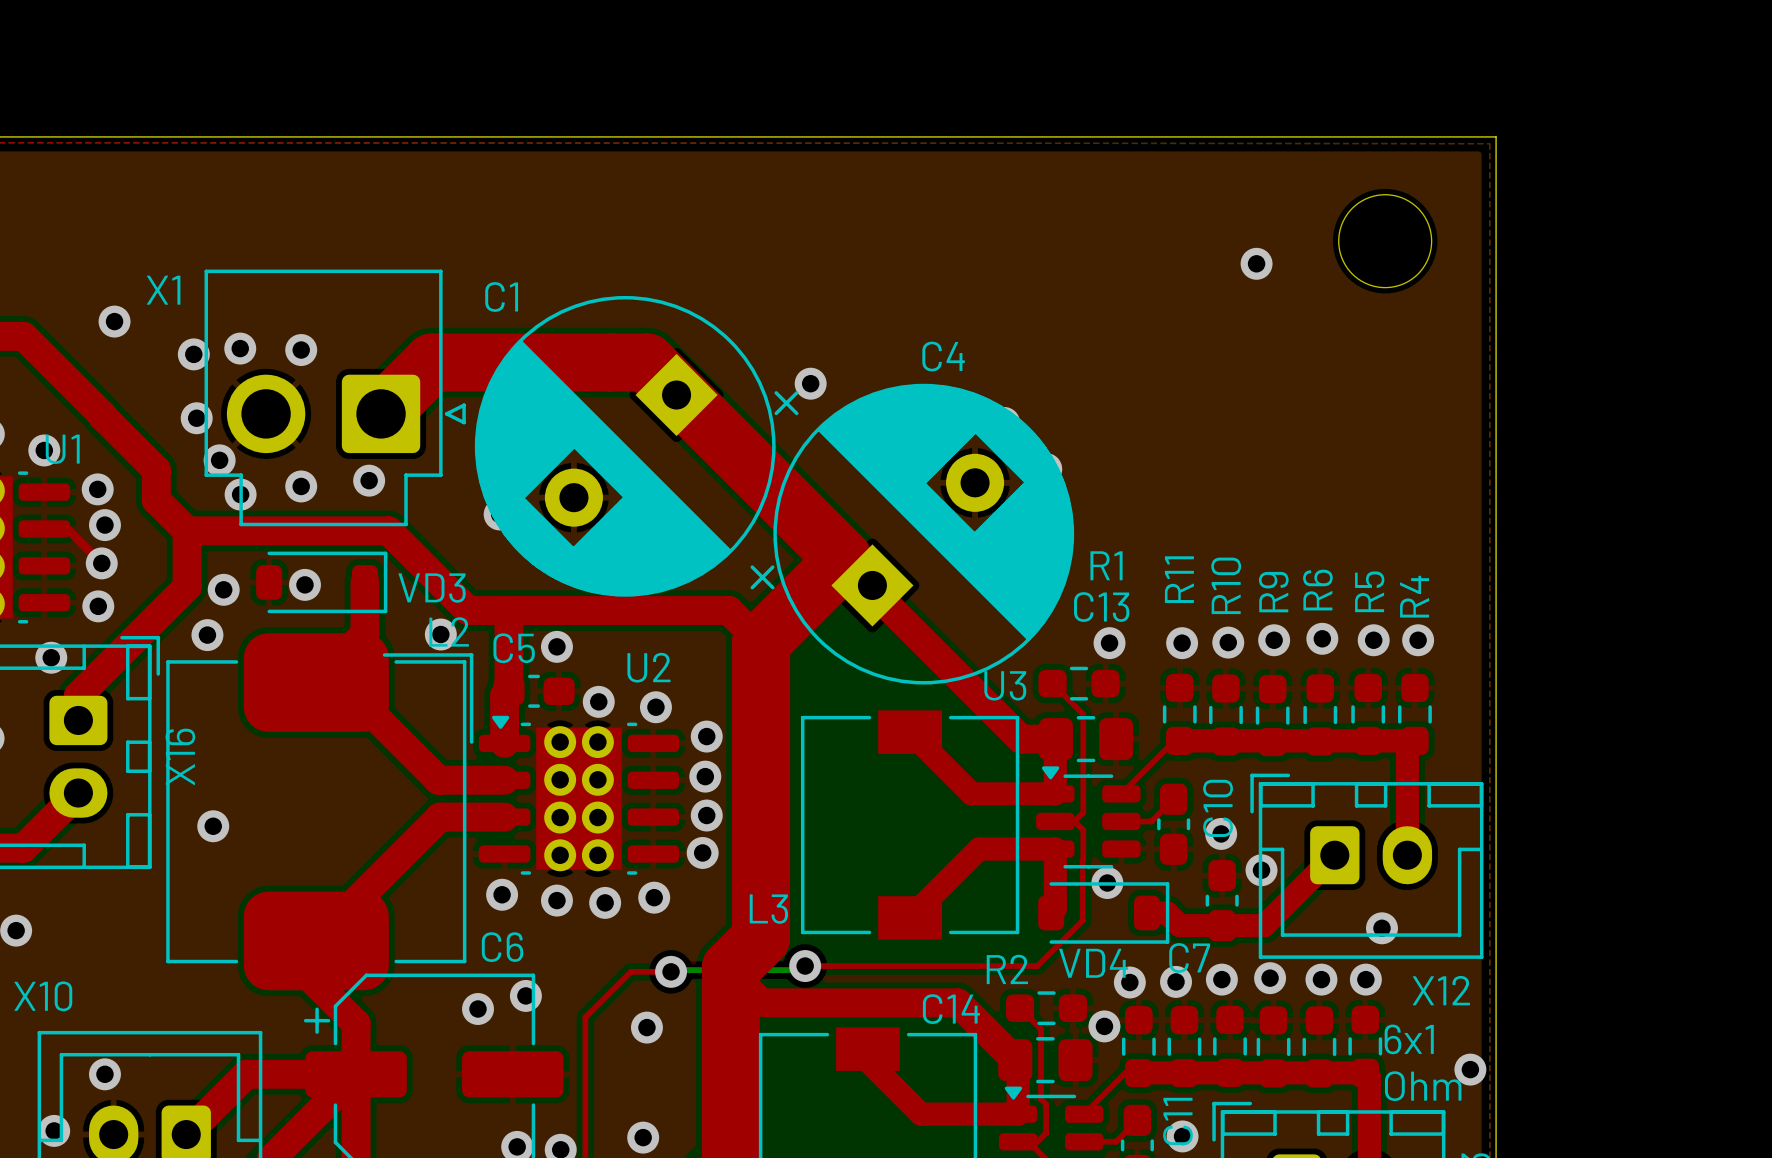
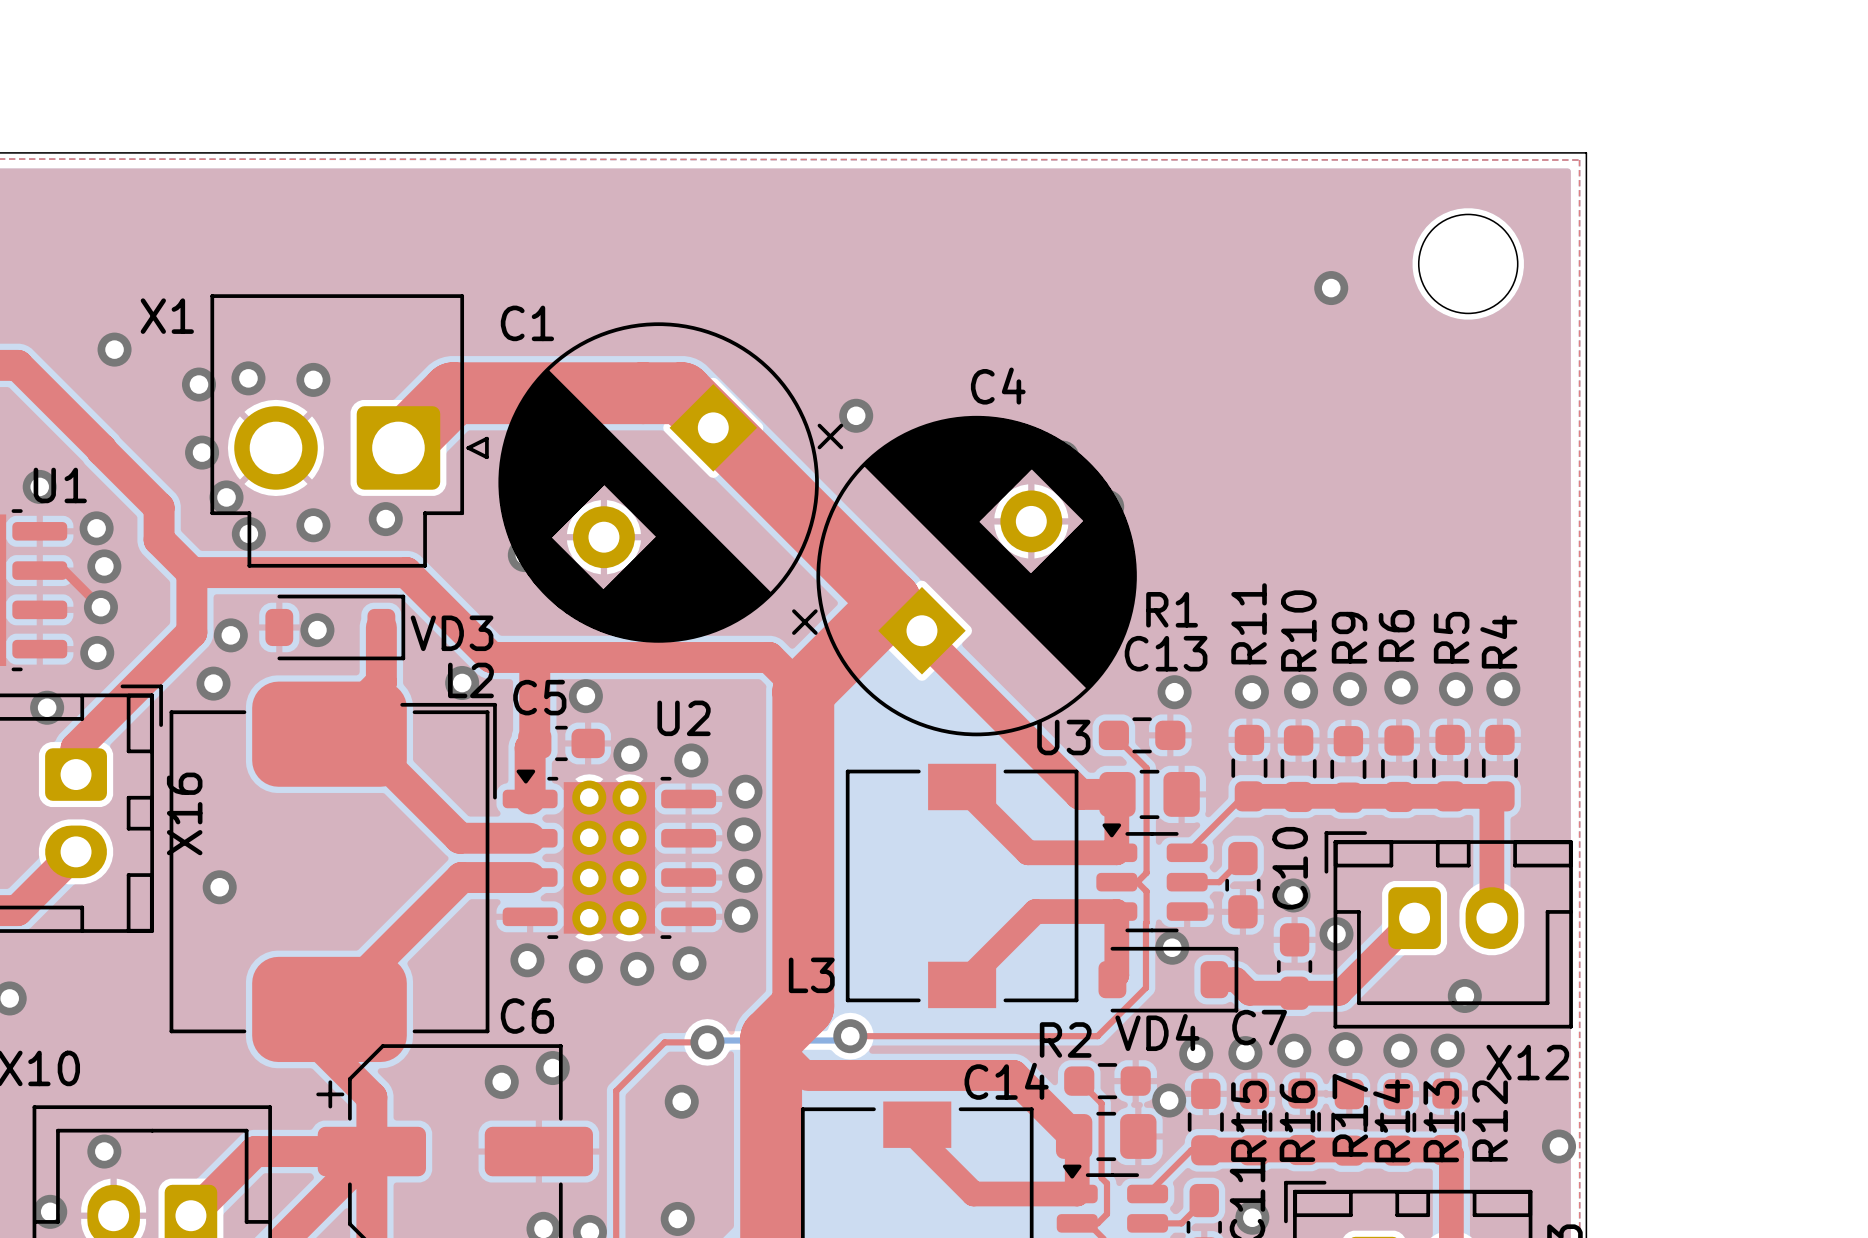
text: 6x1 (1409, 1039) -> none
R17 name: none -> R17 (1350, 1115)
R15 name: none -> R15 (1248, 1121)
R16 name: none -> R16 (1297, 1121)
R12 name: none -> R12 (1490, 1121)
R14 name: none -> R14 (1391, 1120)
R13 name: none -> R13 (1441, 1121)
text: Ohm (1423, 1086) -> none

